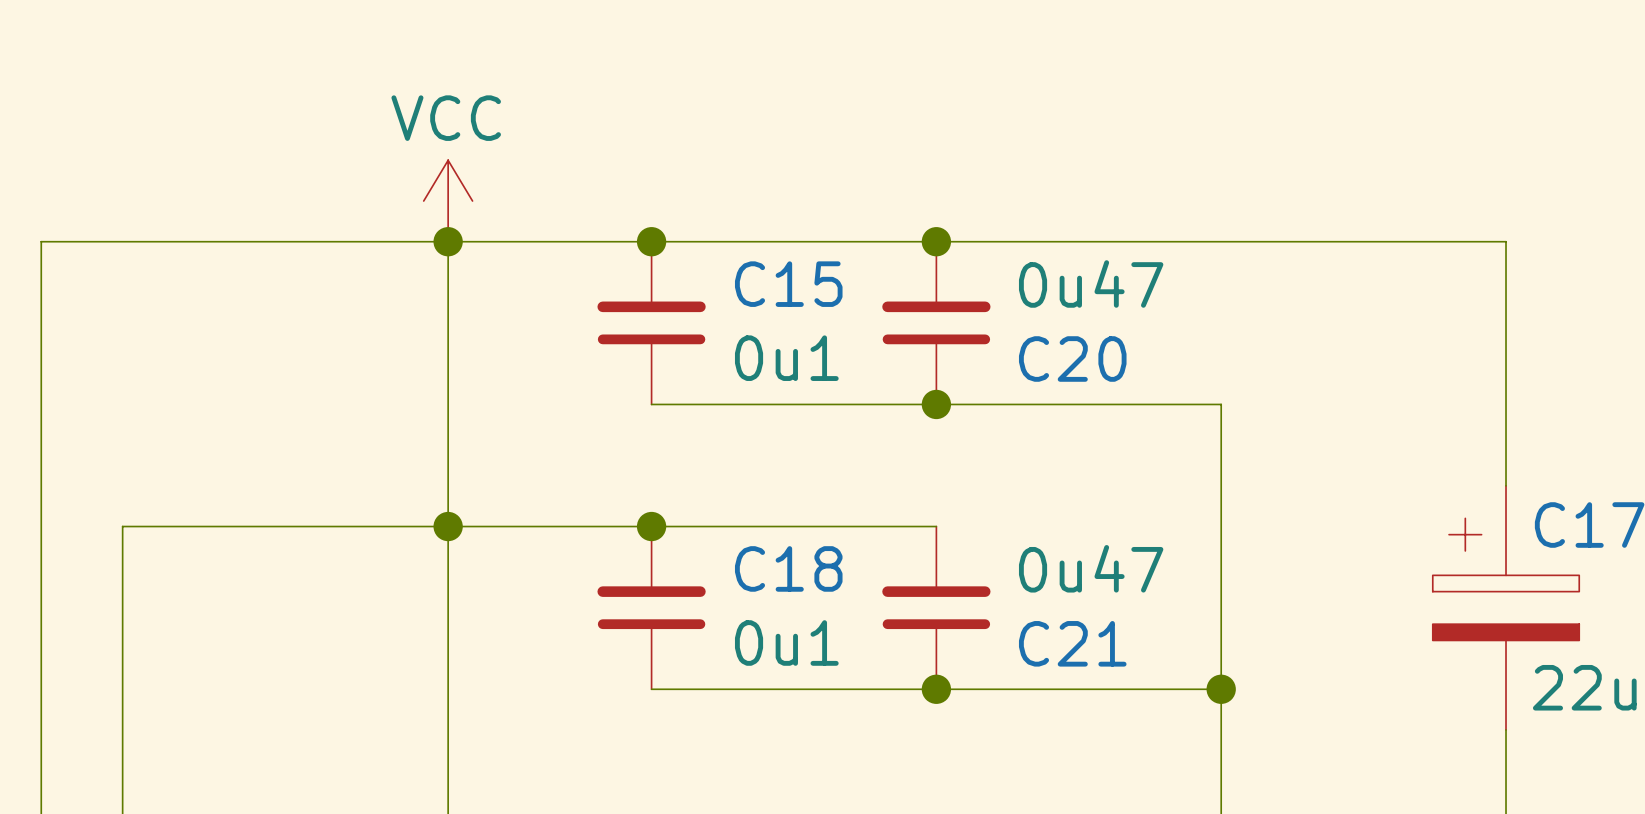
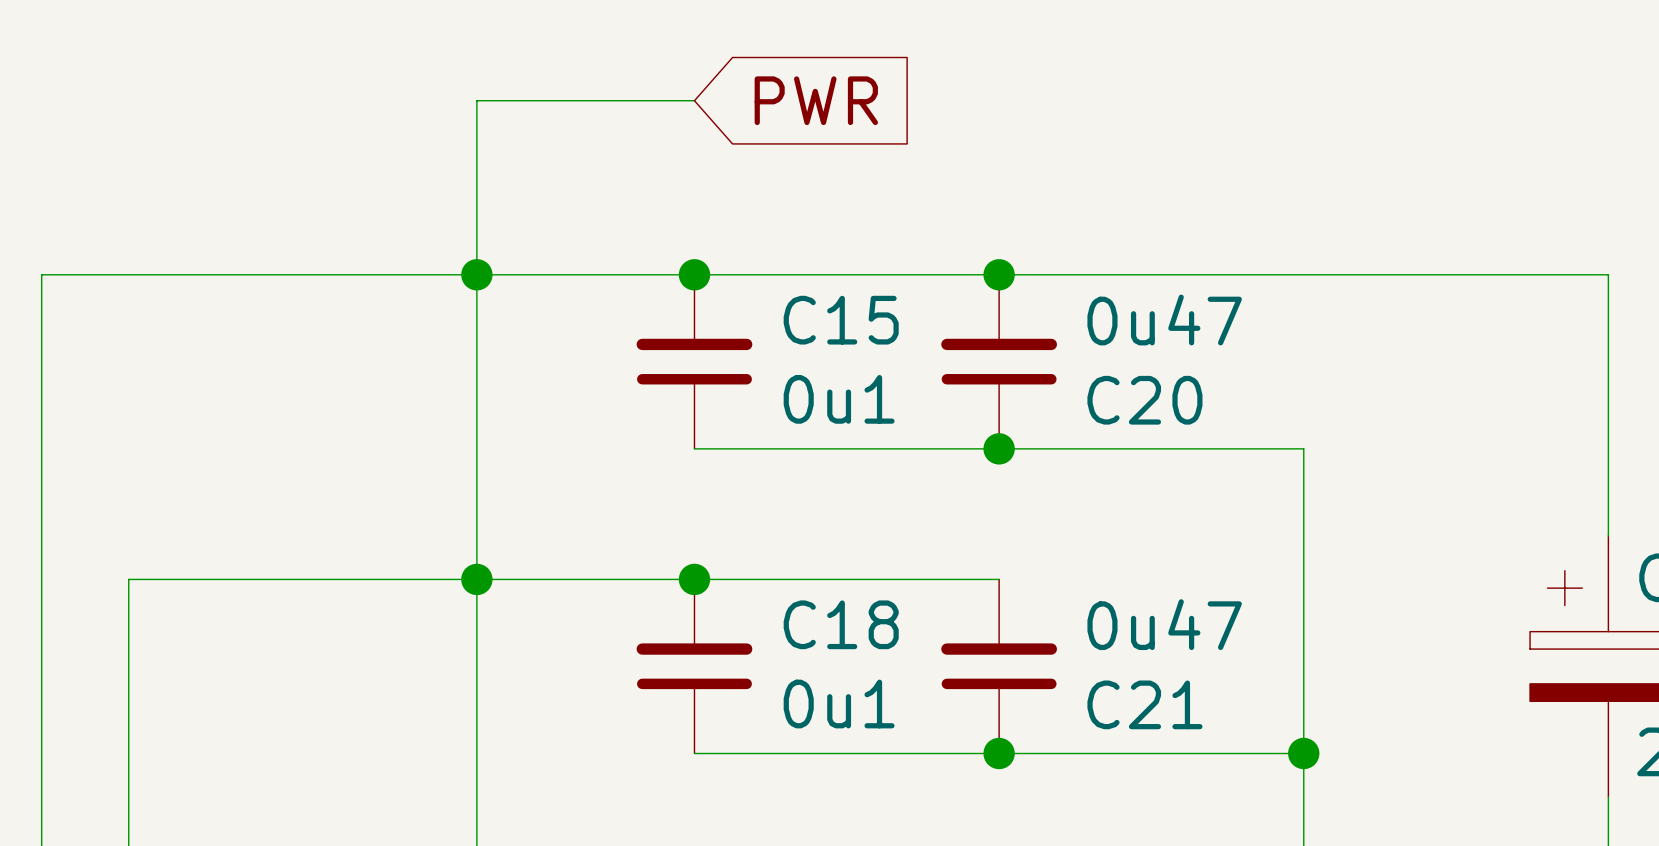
wire: none -> (694, 100) (476, 100) (476, 274)
global label: none -> PWR (816, 100)
power symbol: VCC (448, 201) -> none

